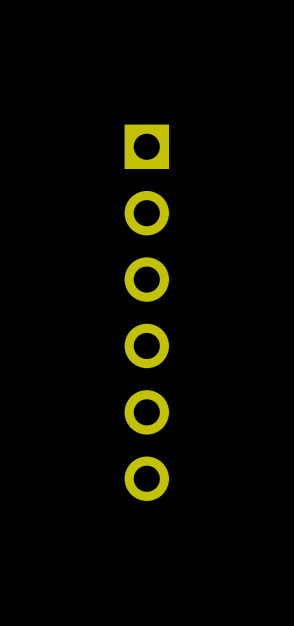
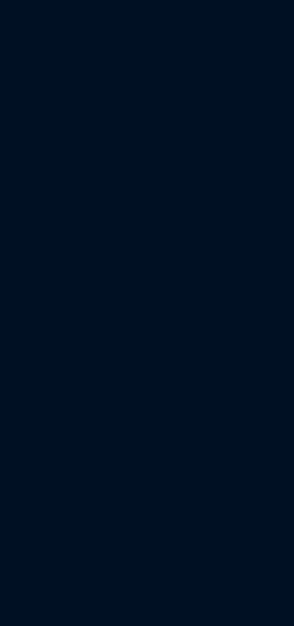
part: (146, 312) -> none

